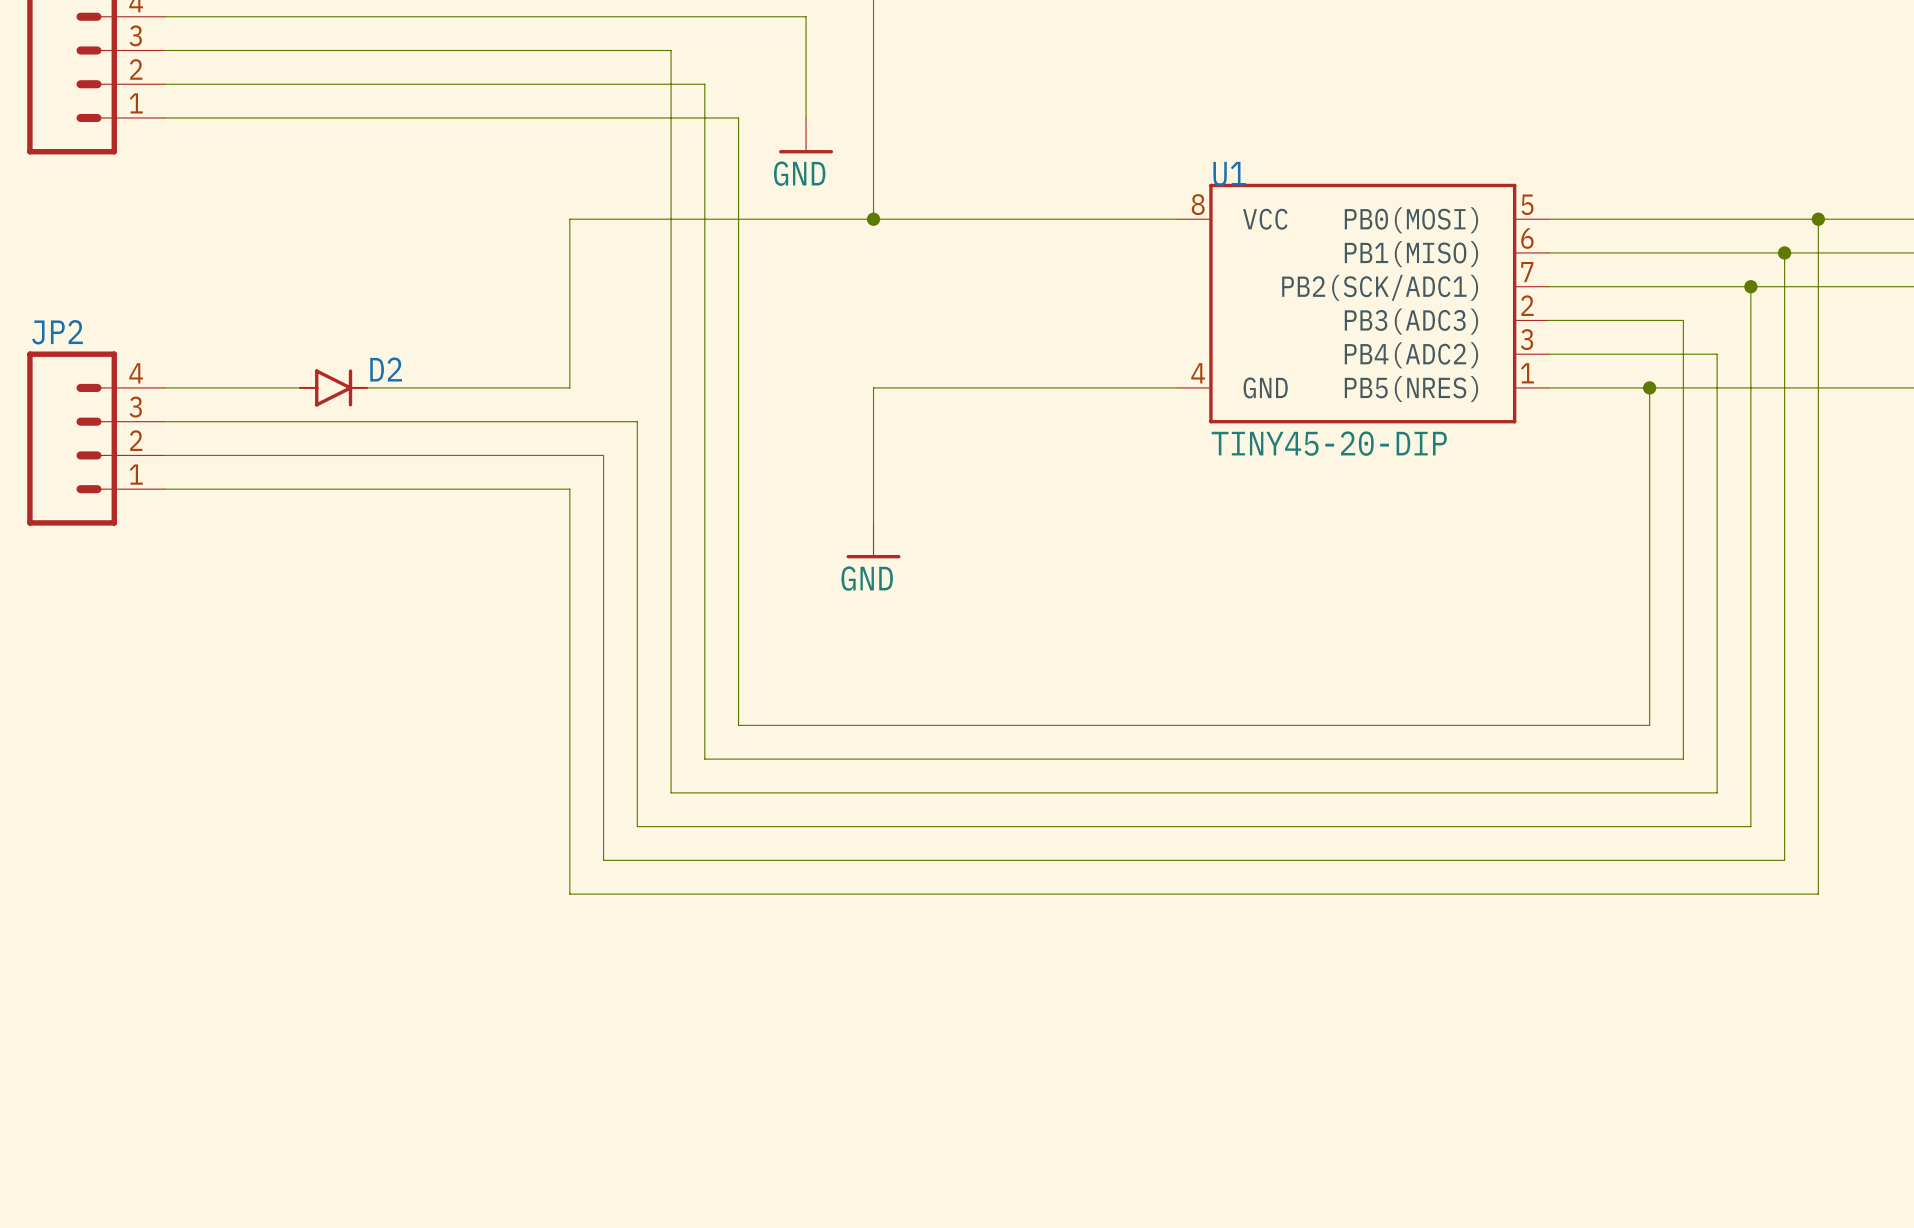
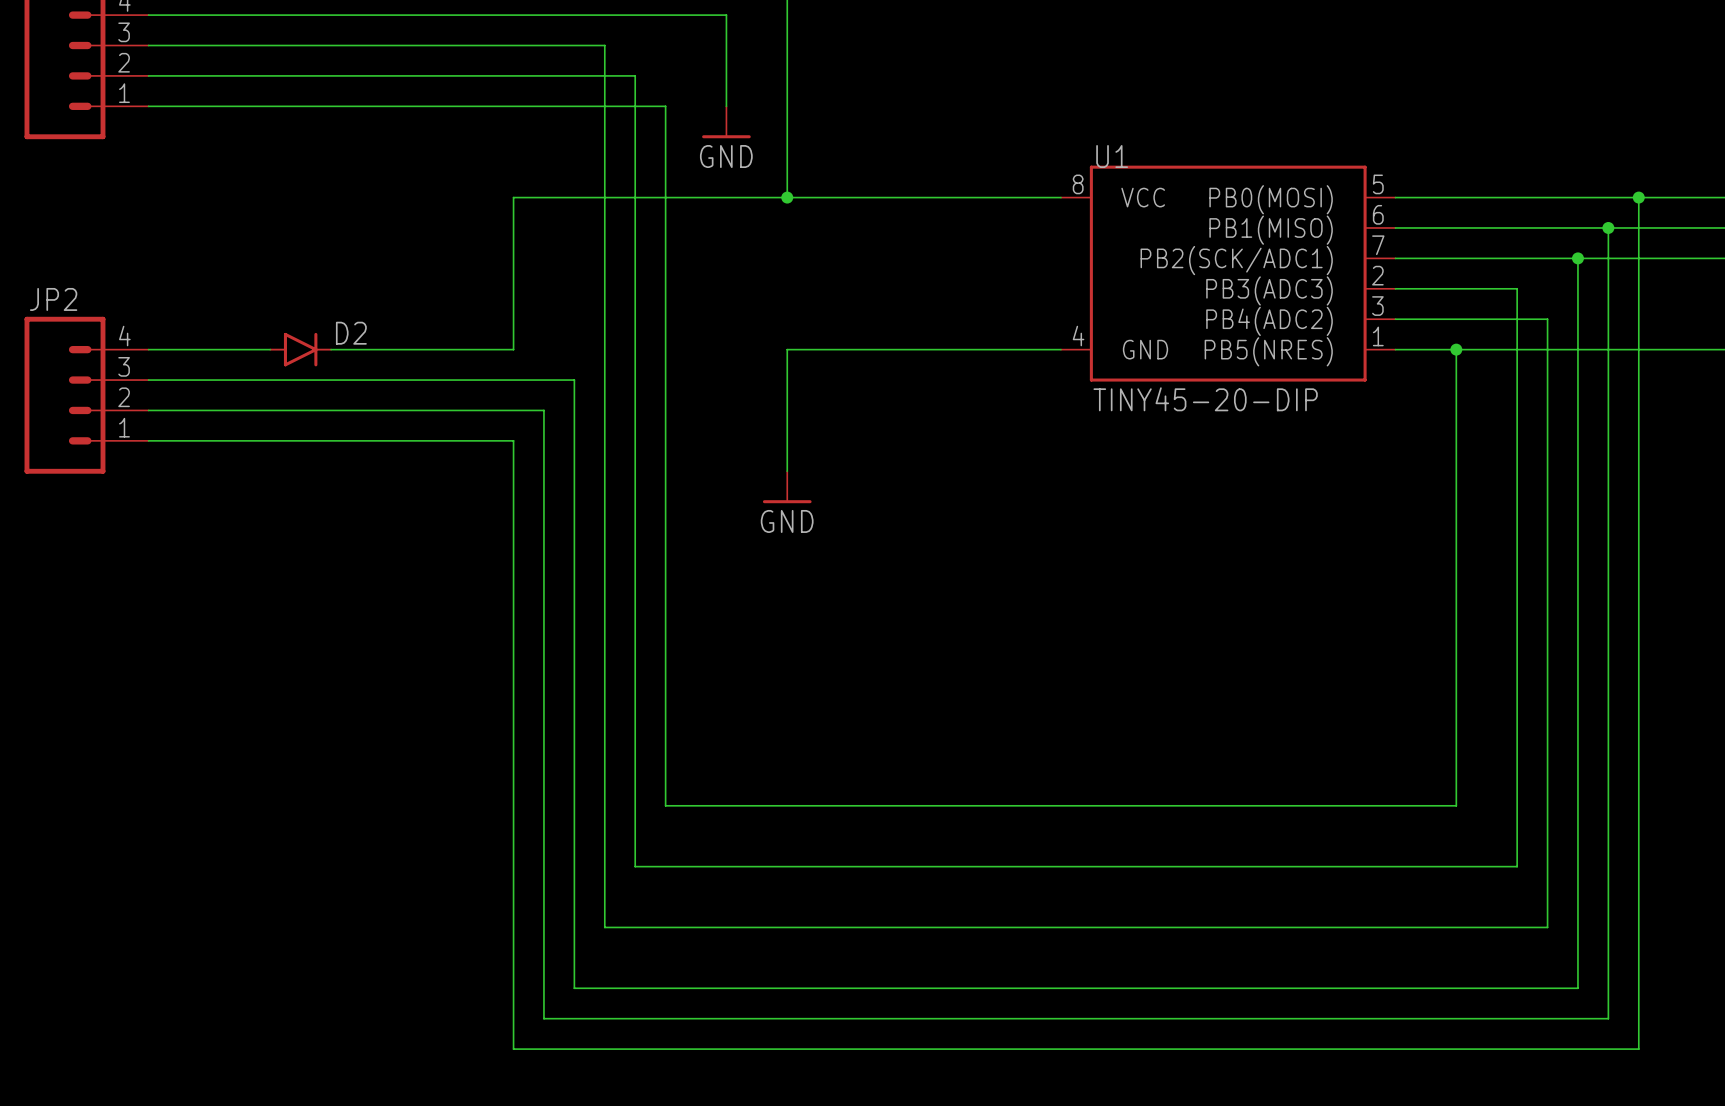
wire: (1649, 387) (1649, 725) (738, 725) -> none
junction position: (1649, 387) -> (1456, 349)
wire: (704, 759) (1683, 759) -> (635, 684) (635, 866) (1517, 866) (1517, 684)
wire: (671, 792) (1717, 792) -> (604, 714) (604, 927) (1547, 927) (1547, 714)
wire: (637, 826) (1750, 826) -> (574, 744) (574, 988) (1577, 988) (1577, 744)
wire: (603, 860) (1784, 860) -> (543, 775) (543, 1018) (1608, 1018) (1608, 775)
wire: (569, 894) (738, 894) -> (665, 653) (665, 805)
wire: none -> (513, 805) (513, 1049) (1638, 1049) (1638, 805)
wire: (1615, 894) (1818, 894) -> (1456, 805) (1456, 349)

